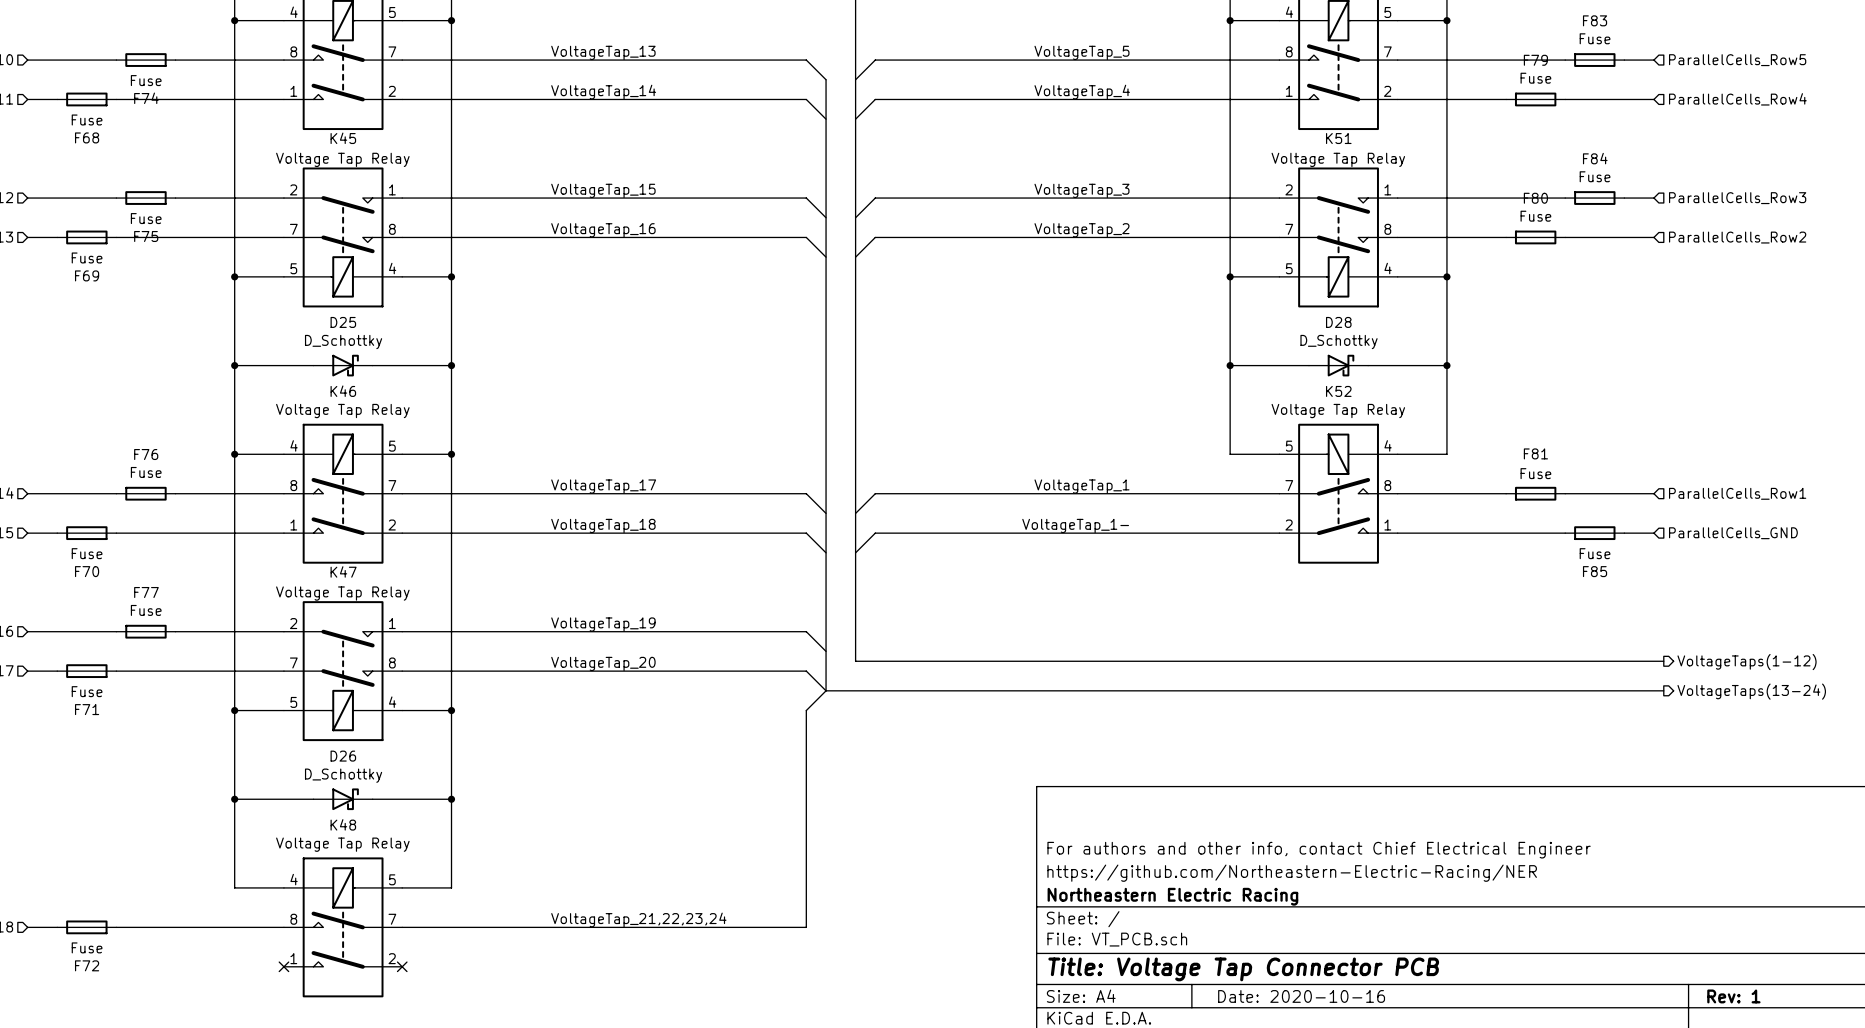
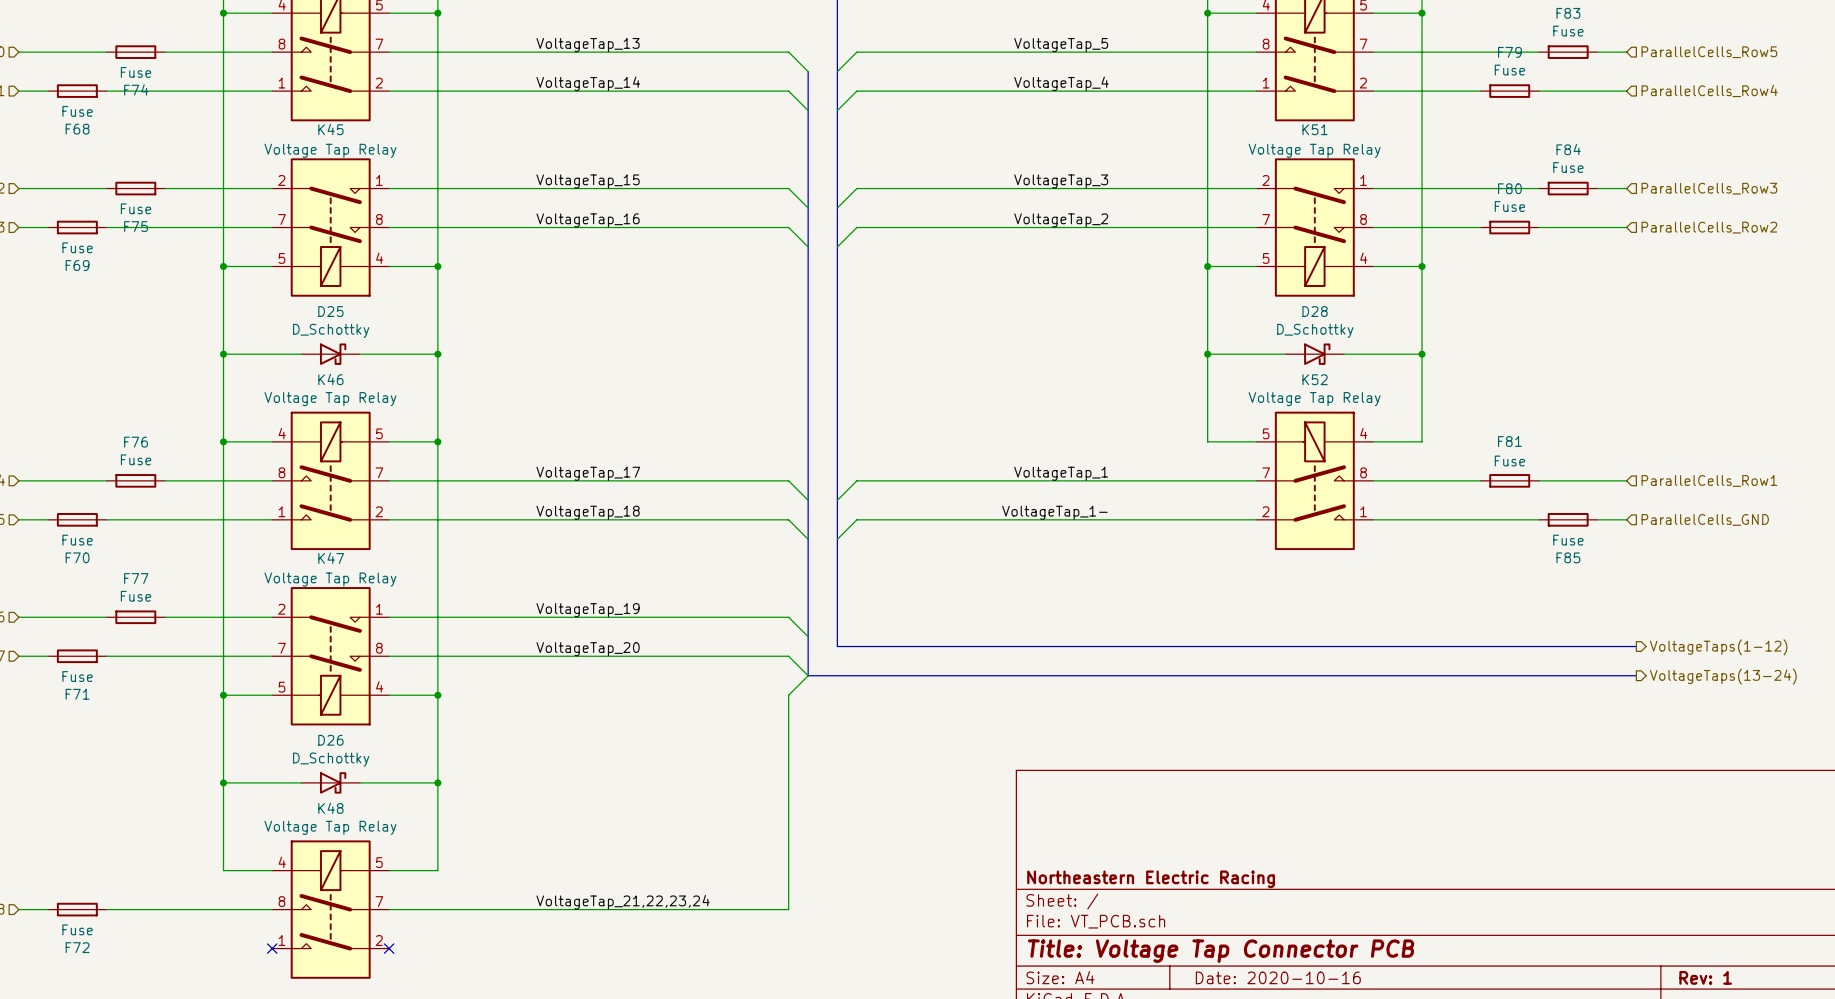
title block: For authors and other info, contact Chief Electrical Engineer (1319, 850) -> none
title block: https://github.com/Northeastern-Electric-Racing/NER (1292, 873) -> none

